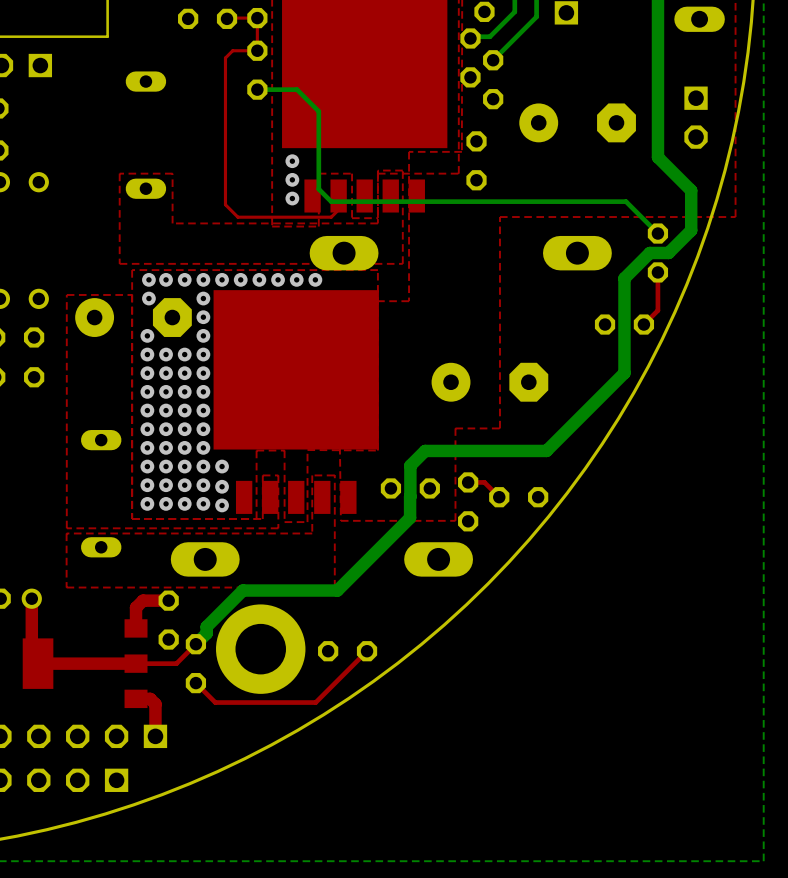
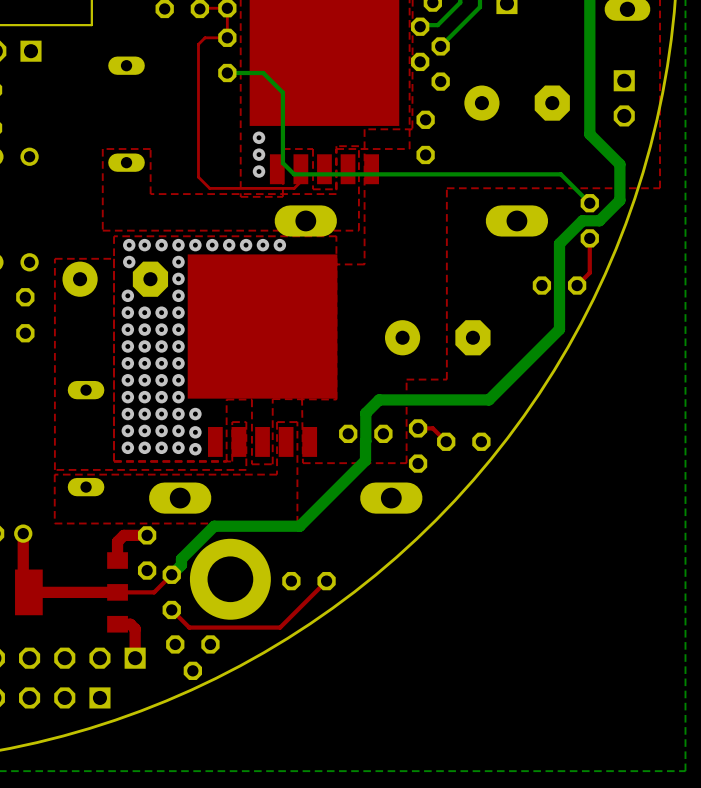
part: none -> (192, 657)

